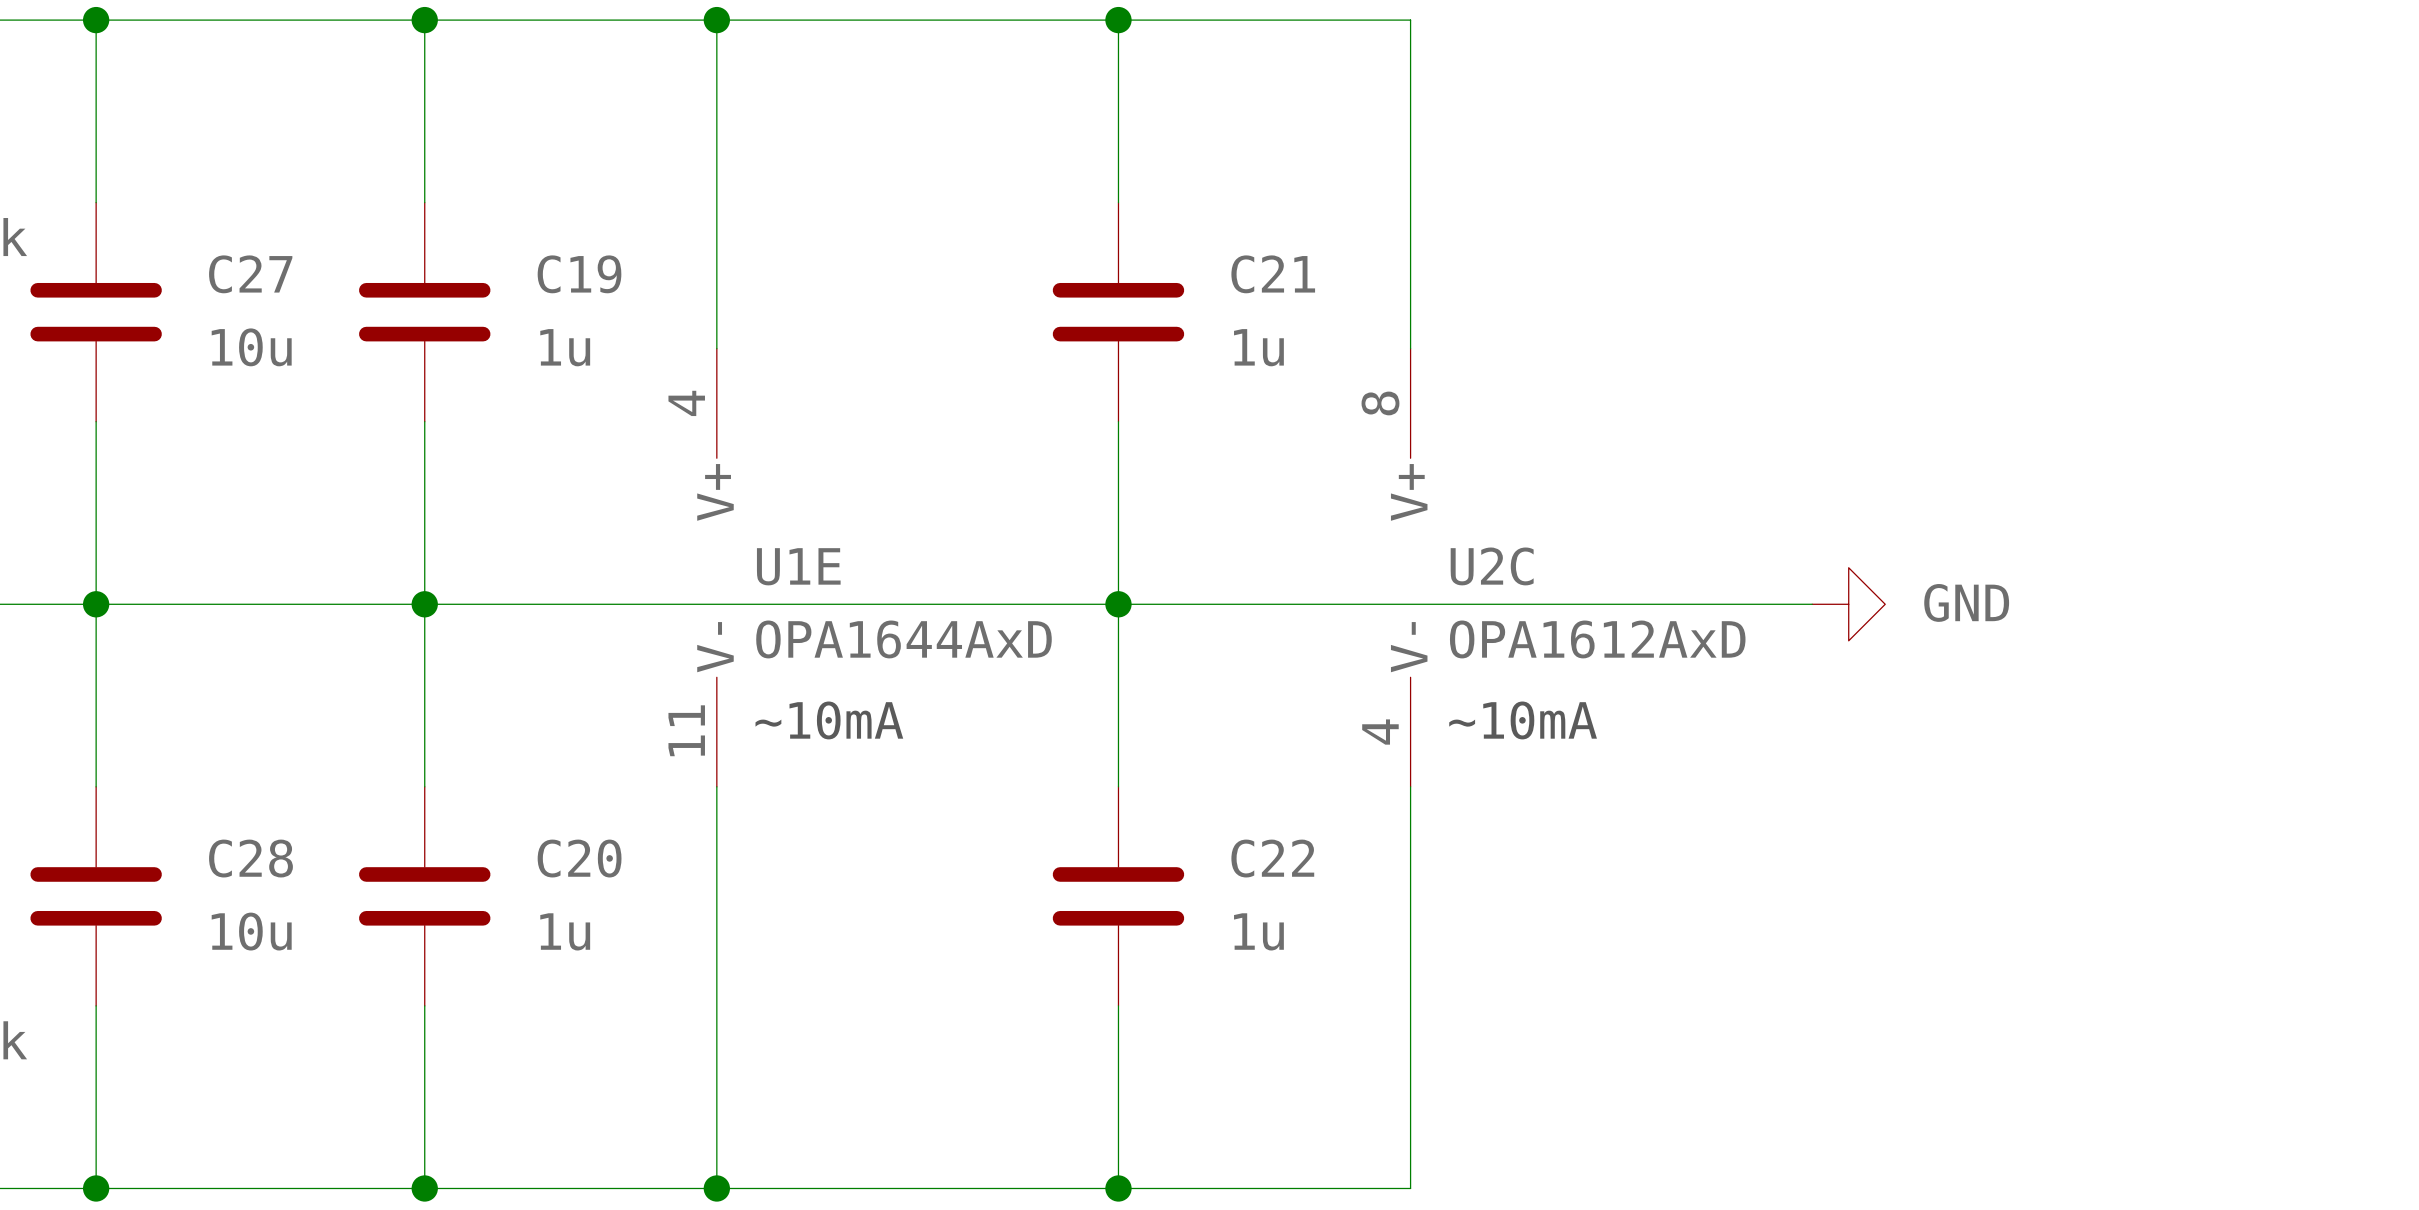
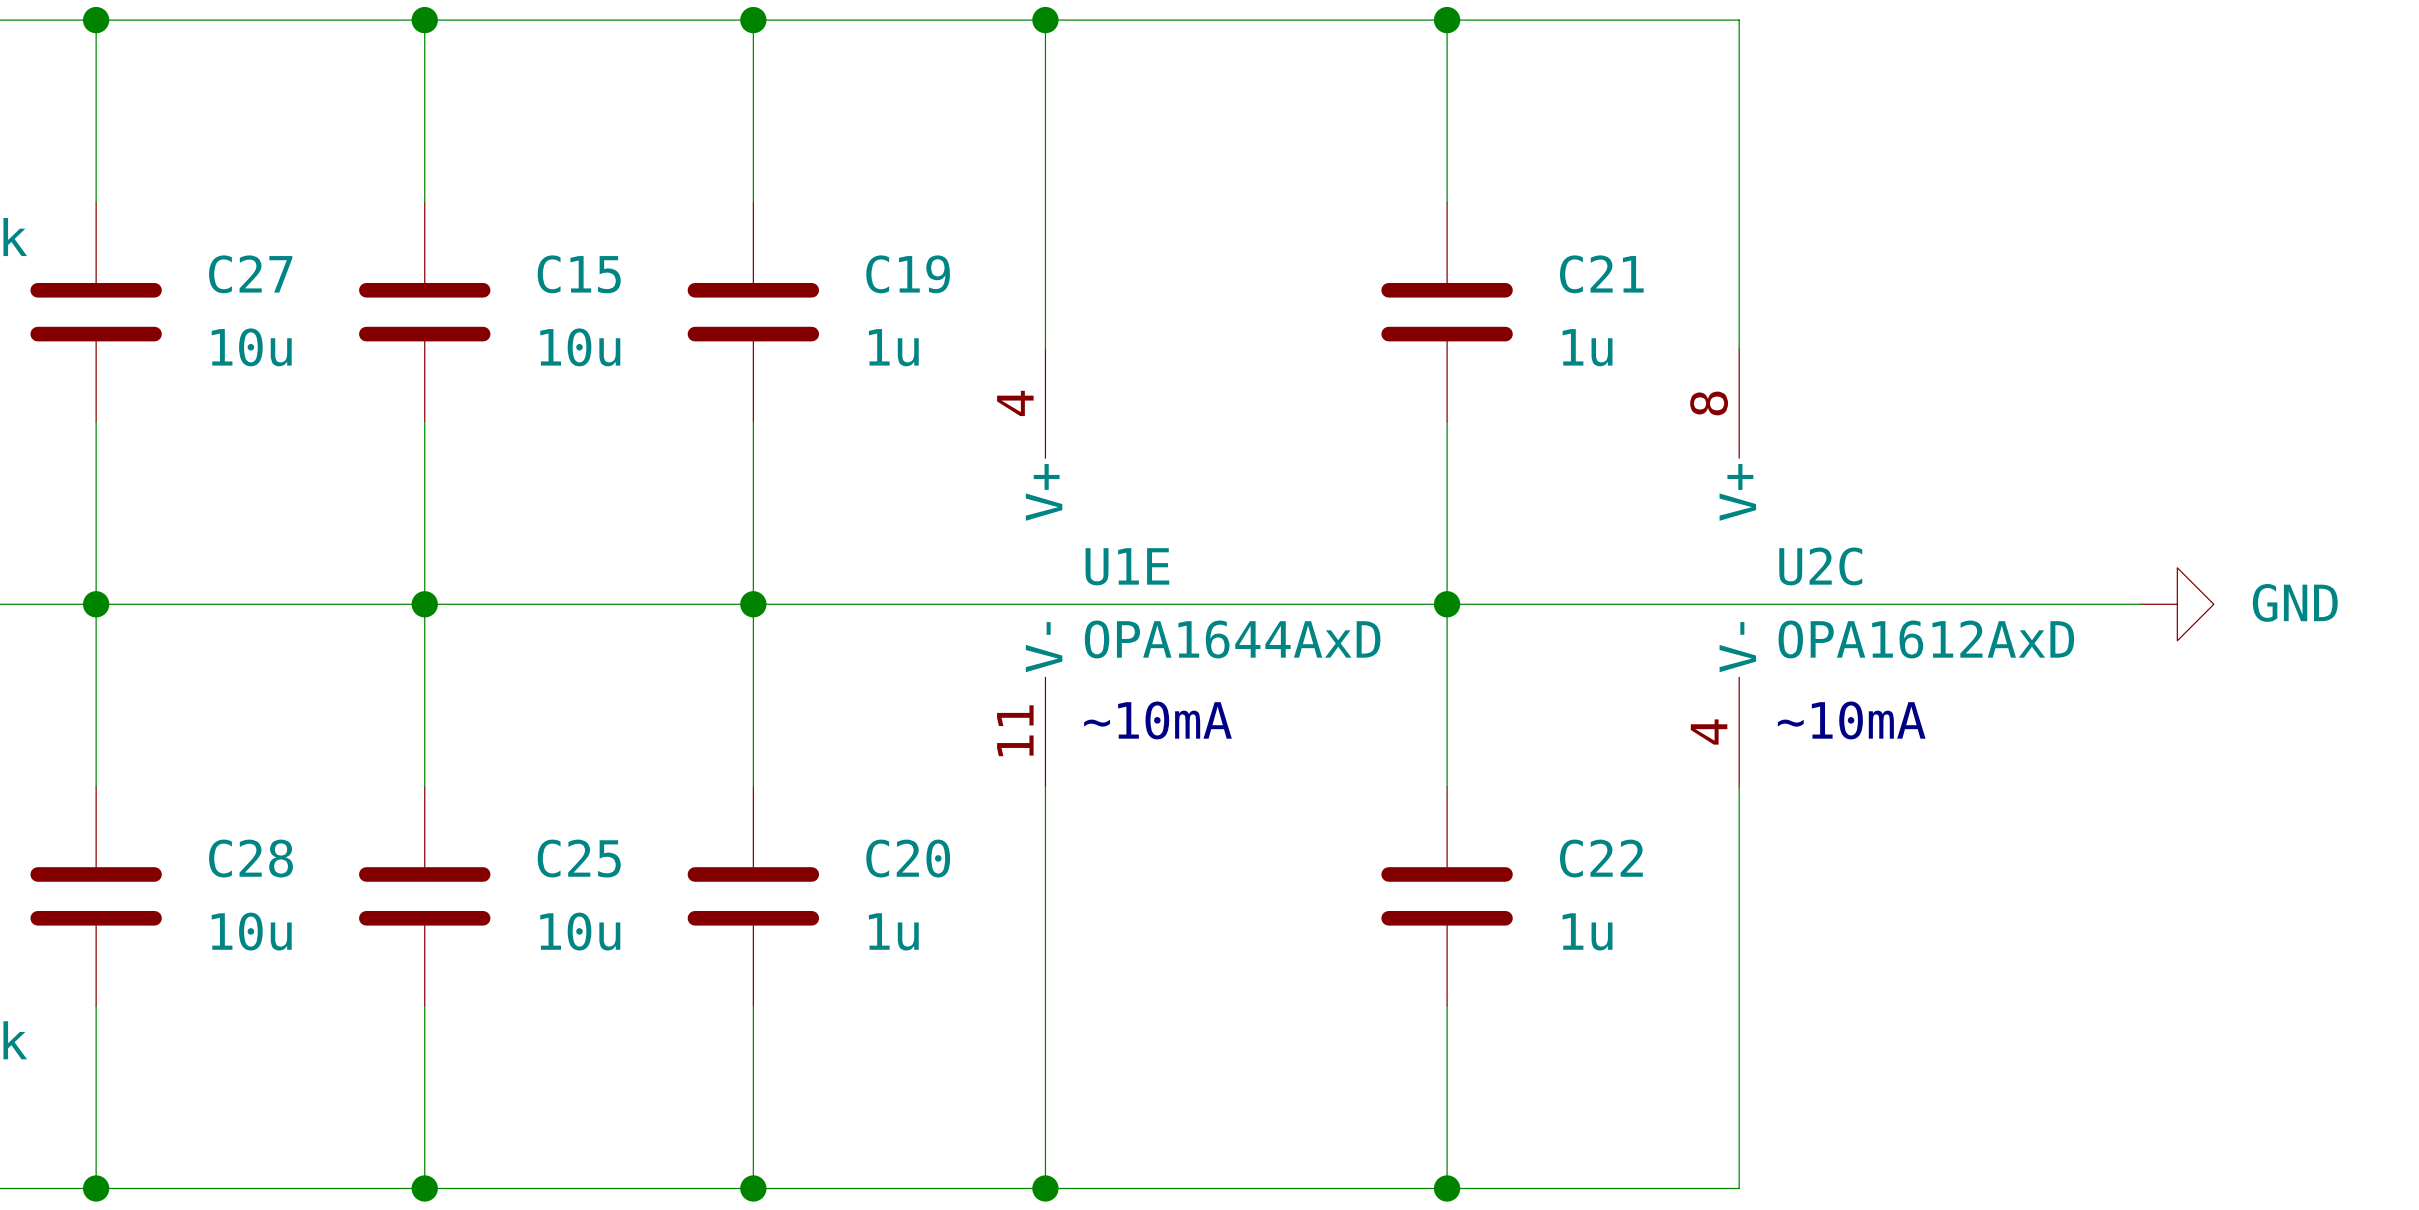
wire: (716, 20) (716, 348) -> (1045, 20) (1045, 348)
junction position: (716, 20) -> (753, 20)
wire: none -> (753, 20) (753, 202)
wire: (1118, 20) (1118, 202) -> (1447, 20) (1447, 202)
junction position: (1118, 20) -> (1045, 20)
wire: (1410, 20) (1410, 348) -> (1410, 20) (1739, 20) (1739, 348)
junction: none -> (1447, 20)
C19 name: C19 (579, 274) -> C15 (579, 274)
C19: none -> 1u (753, 312)
C21 position: (1118, 312) -> (1447, 312)
C19 value: 1u (565, 347) -> 10u (580, 347)
wire: none -> (753, 421) (753, 786)
wire: (1118, 421) (1118, 786) -> (1447, 421) (1447, 786)
U1E position: (716, 567) -> (1045, 567)
U2C position: (1410, 567) -> (1739, 567)
junction: none -> (753, 604)
junction: (1118, 604) -> none
junction: none -> (1447, 604)
wire: none -> (1812, 604) (2140, 604)
power symbol position: GND (1848, 604) -> GND (2177, 604)
text: ~10mA (829, 720) -> none
text: none -> ~10mA (1157, 720)
text: ~10mA (1523, 720) -> none
text: none -> ~10mA (1851, 720)
wire: (716, 786) (716, 1188) -> (1045, 786) (1045, 1188)
wire: (1410, 786) (1410, 1188) -> (1739, 786) (1739, 1188) (1410, 1188)
C20 name: C20 (579, 858) -> C25 (579, 858)
C20: none -> 1u (753, 896)
C22 position: (1118, 896) -> (1447, 896)
C20 value: 1u (565, 931) -> 10u (580, 931)
wire: none -> (753, 1005) (753, 1188)
wire: (1118, 1005) (1118, 1188) -> (1447, 1005) (1447, 1188)
junction position: (716, 1188) -> (753, 1188)
junction position: (1118, 1188) -> (1045, 1188)
junction: none -> (1447, 1188)

